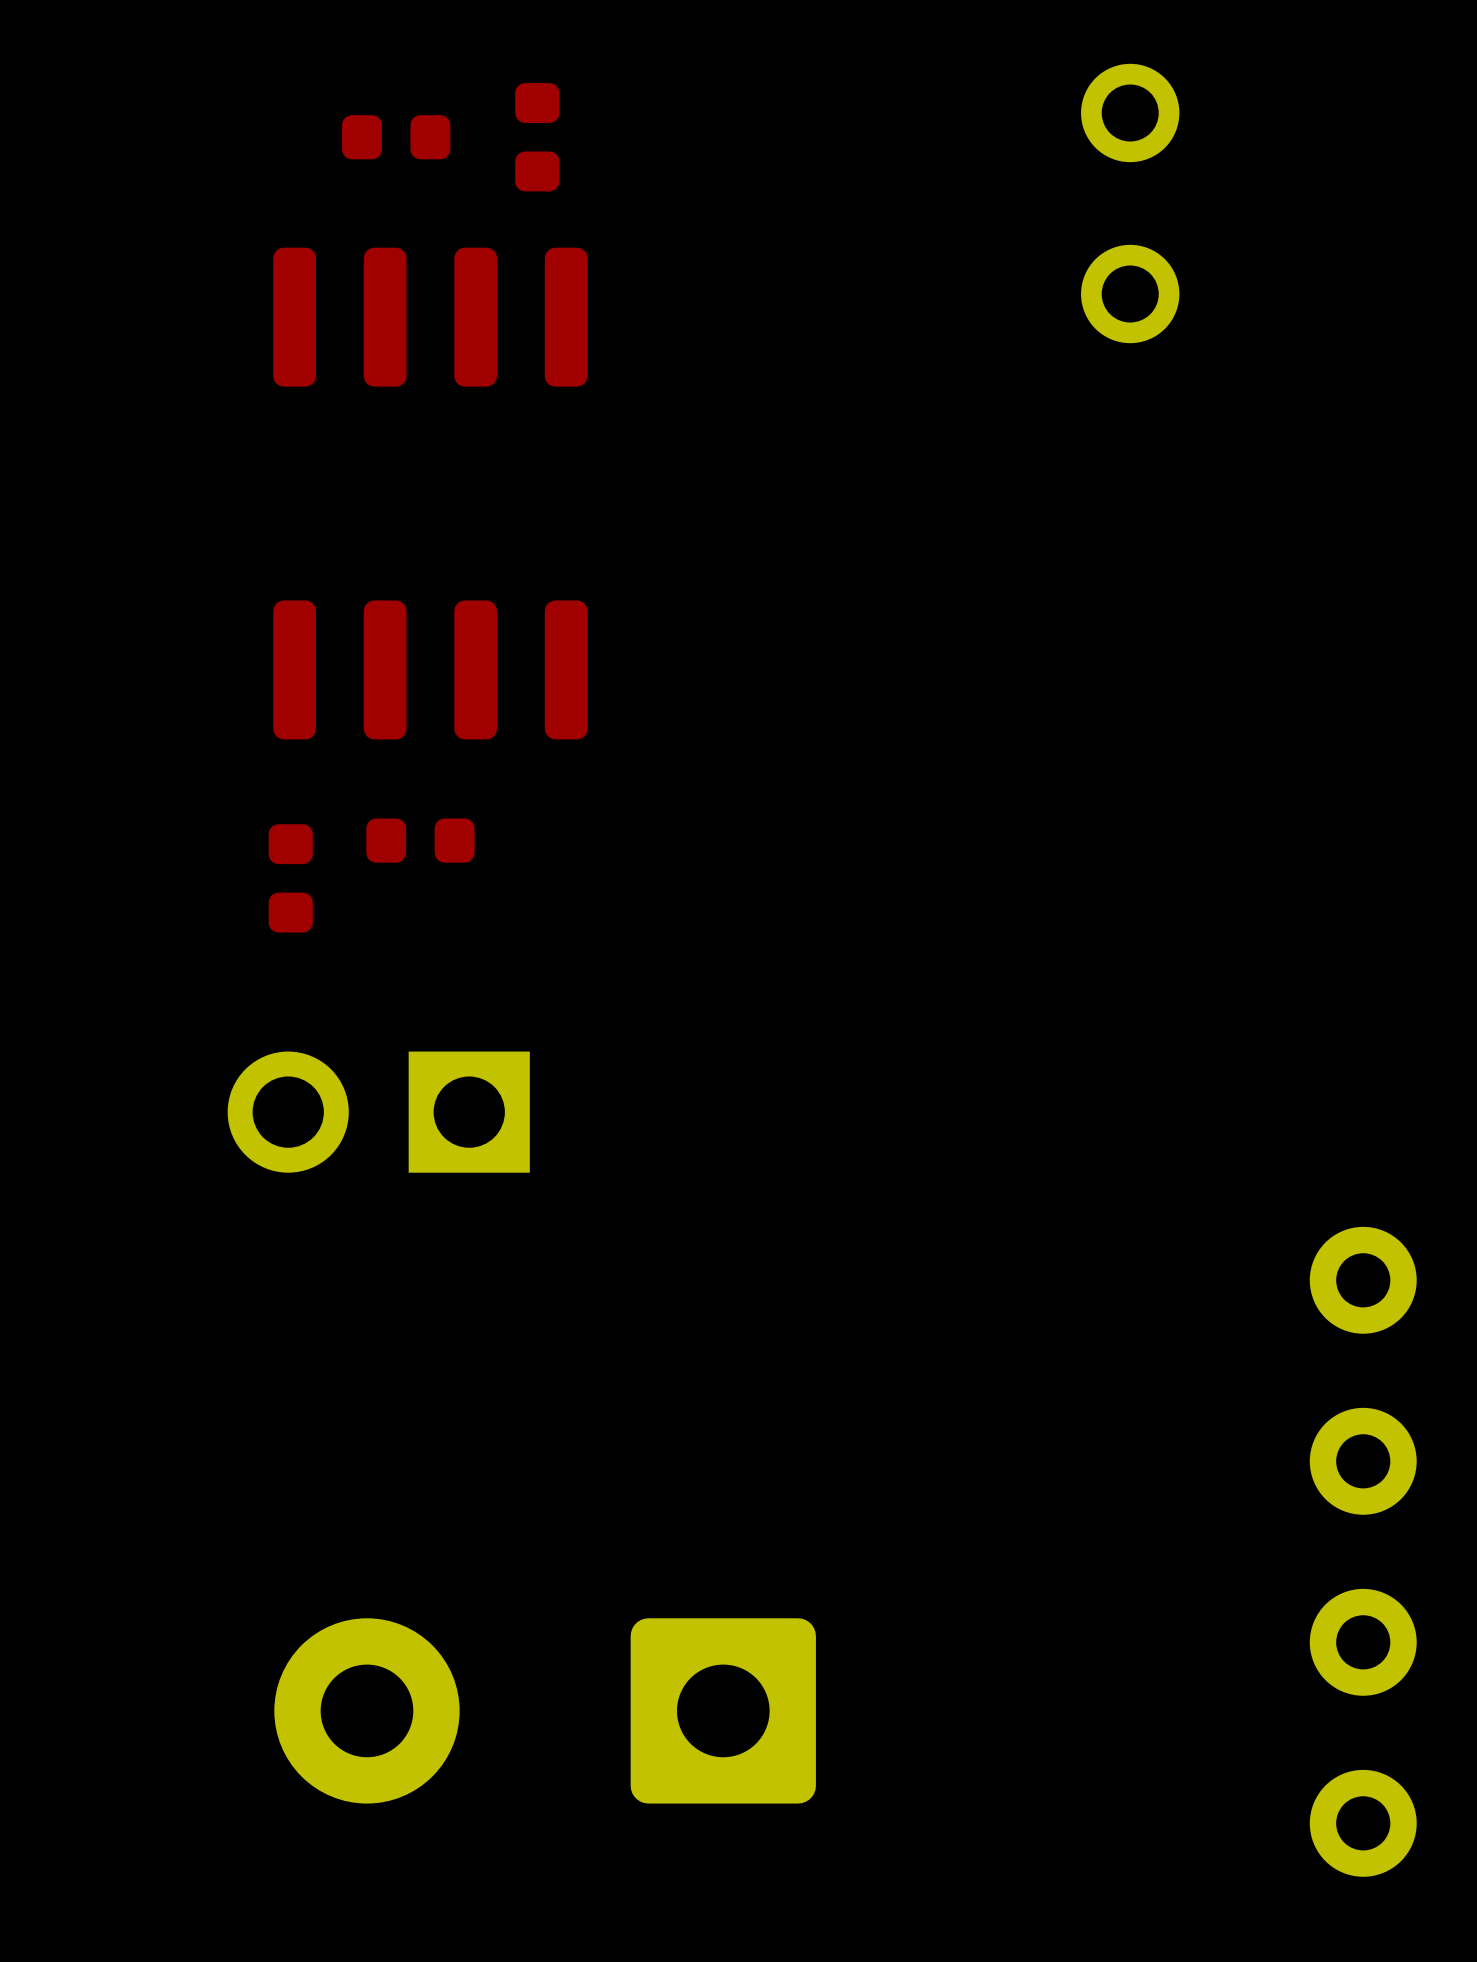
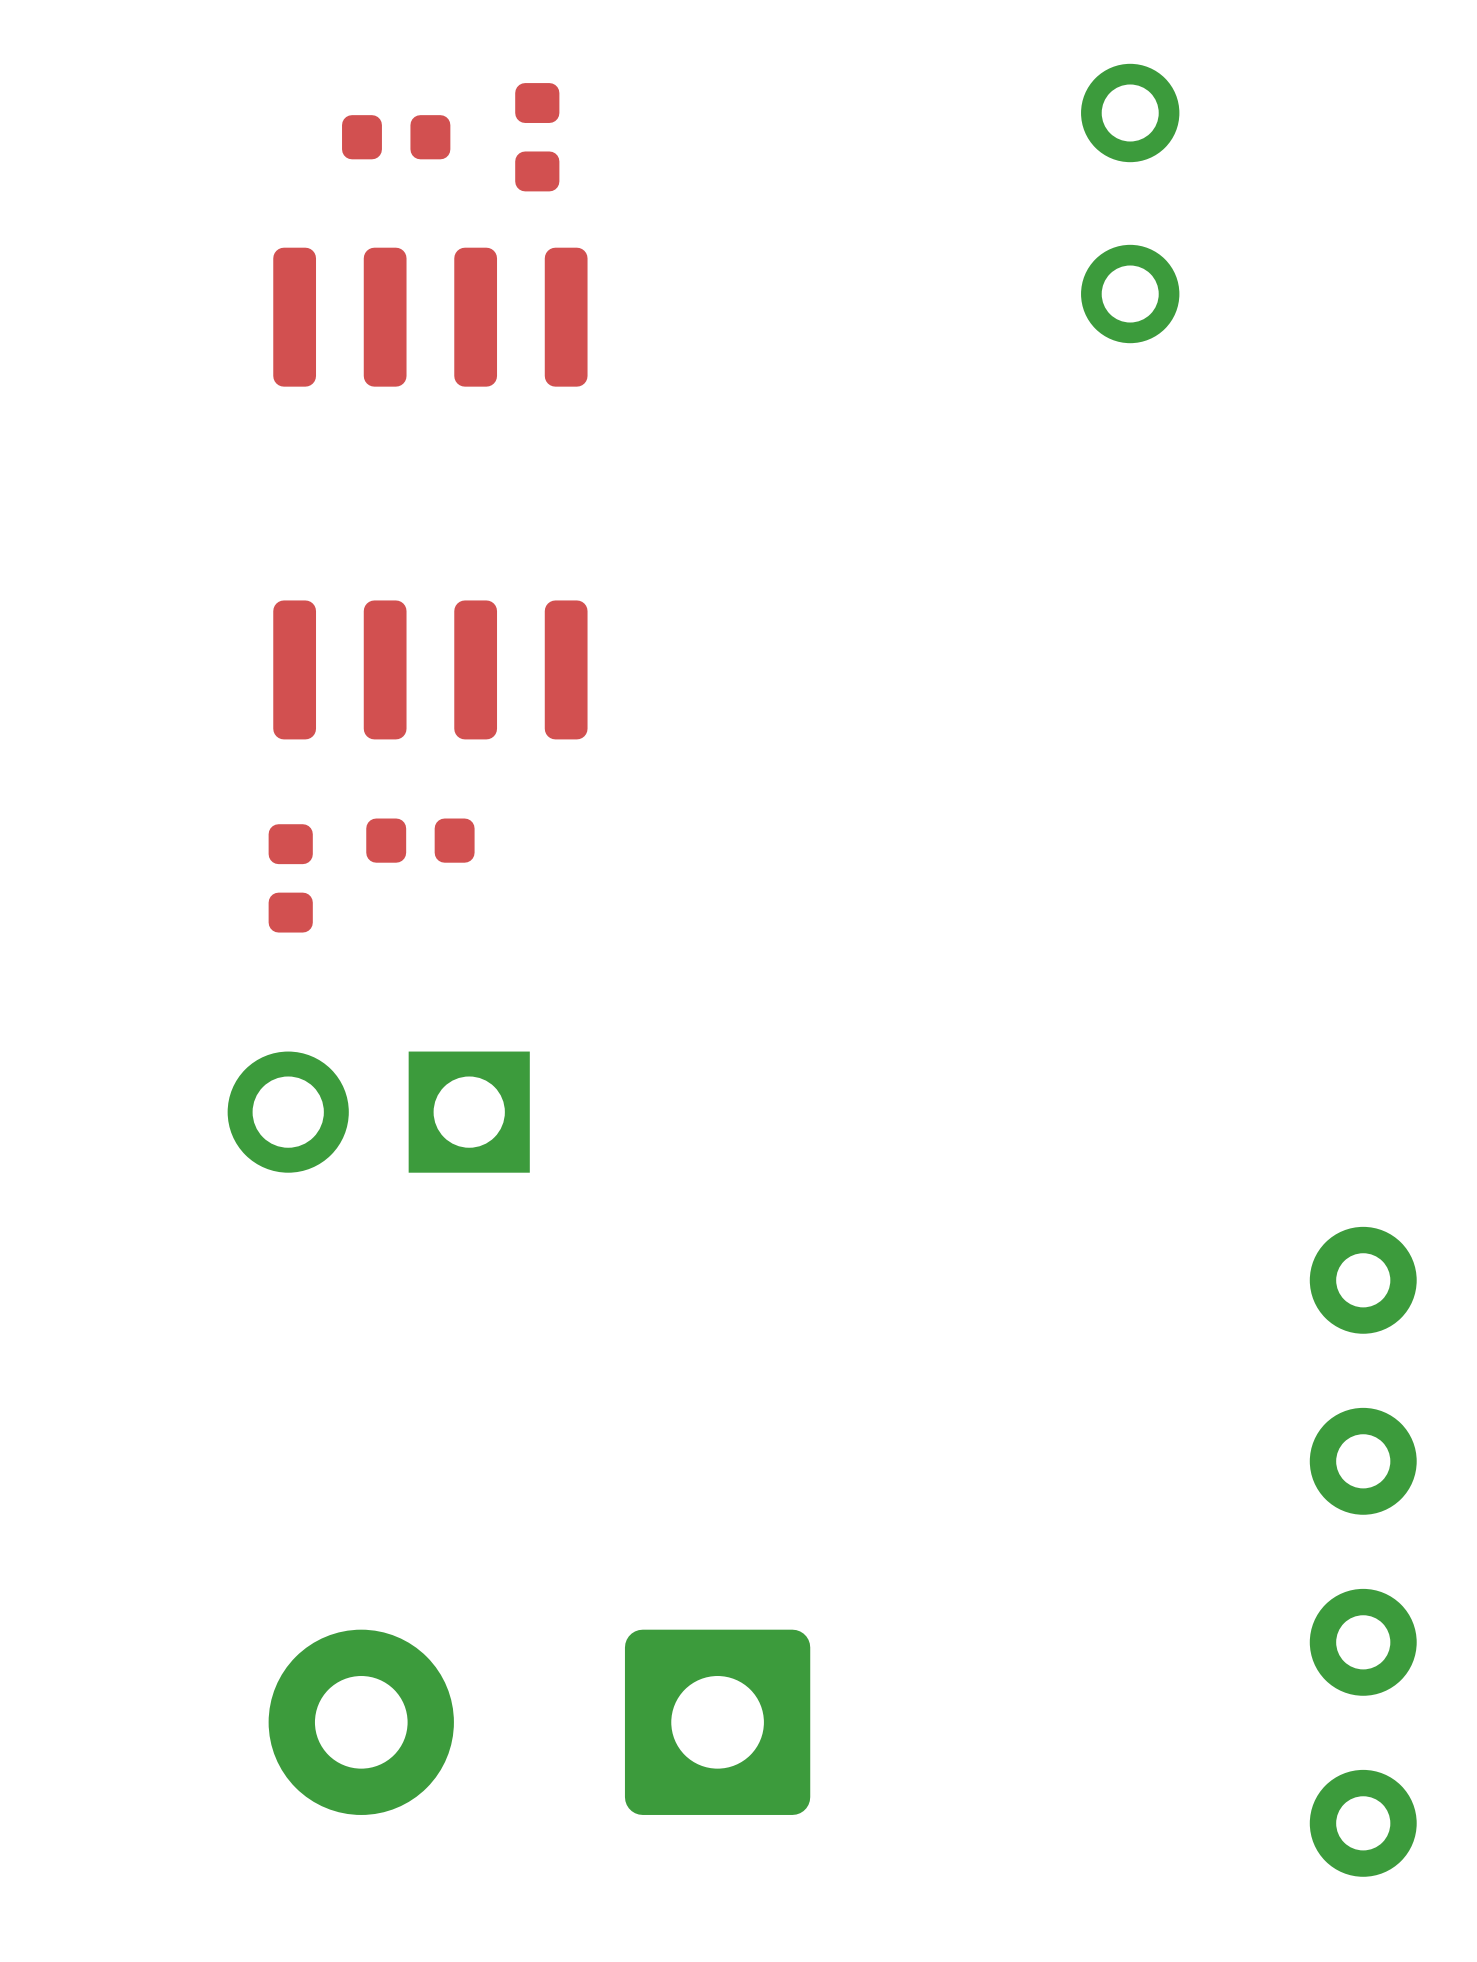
part position: (545, 1710) -> (539, 1722)

